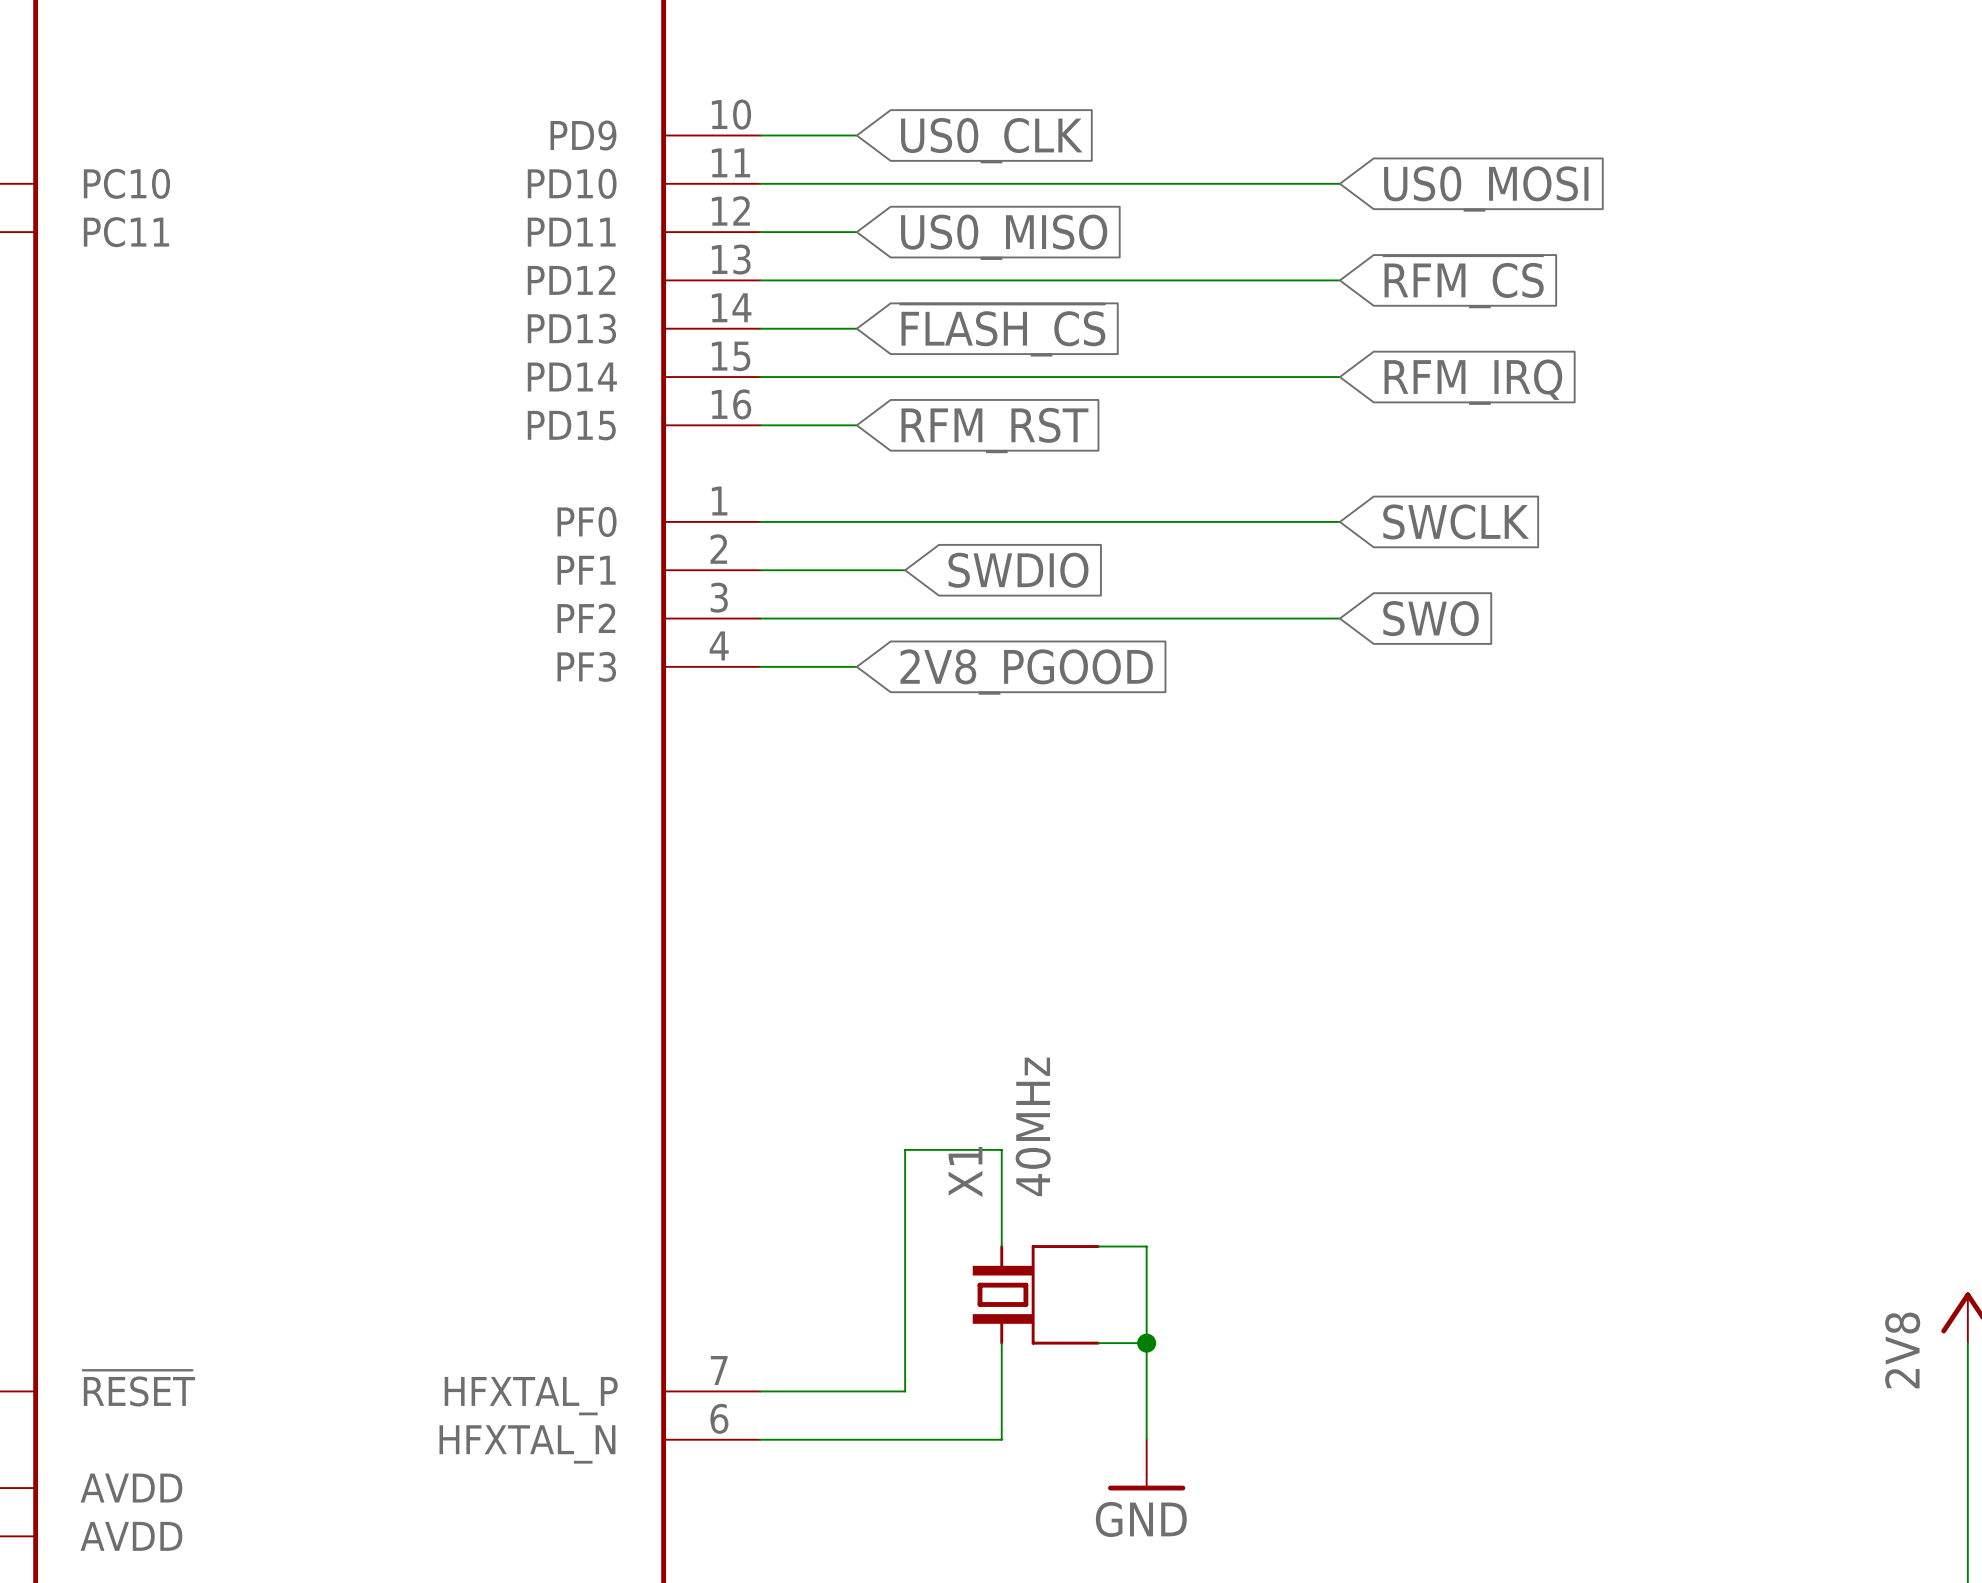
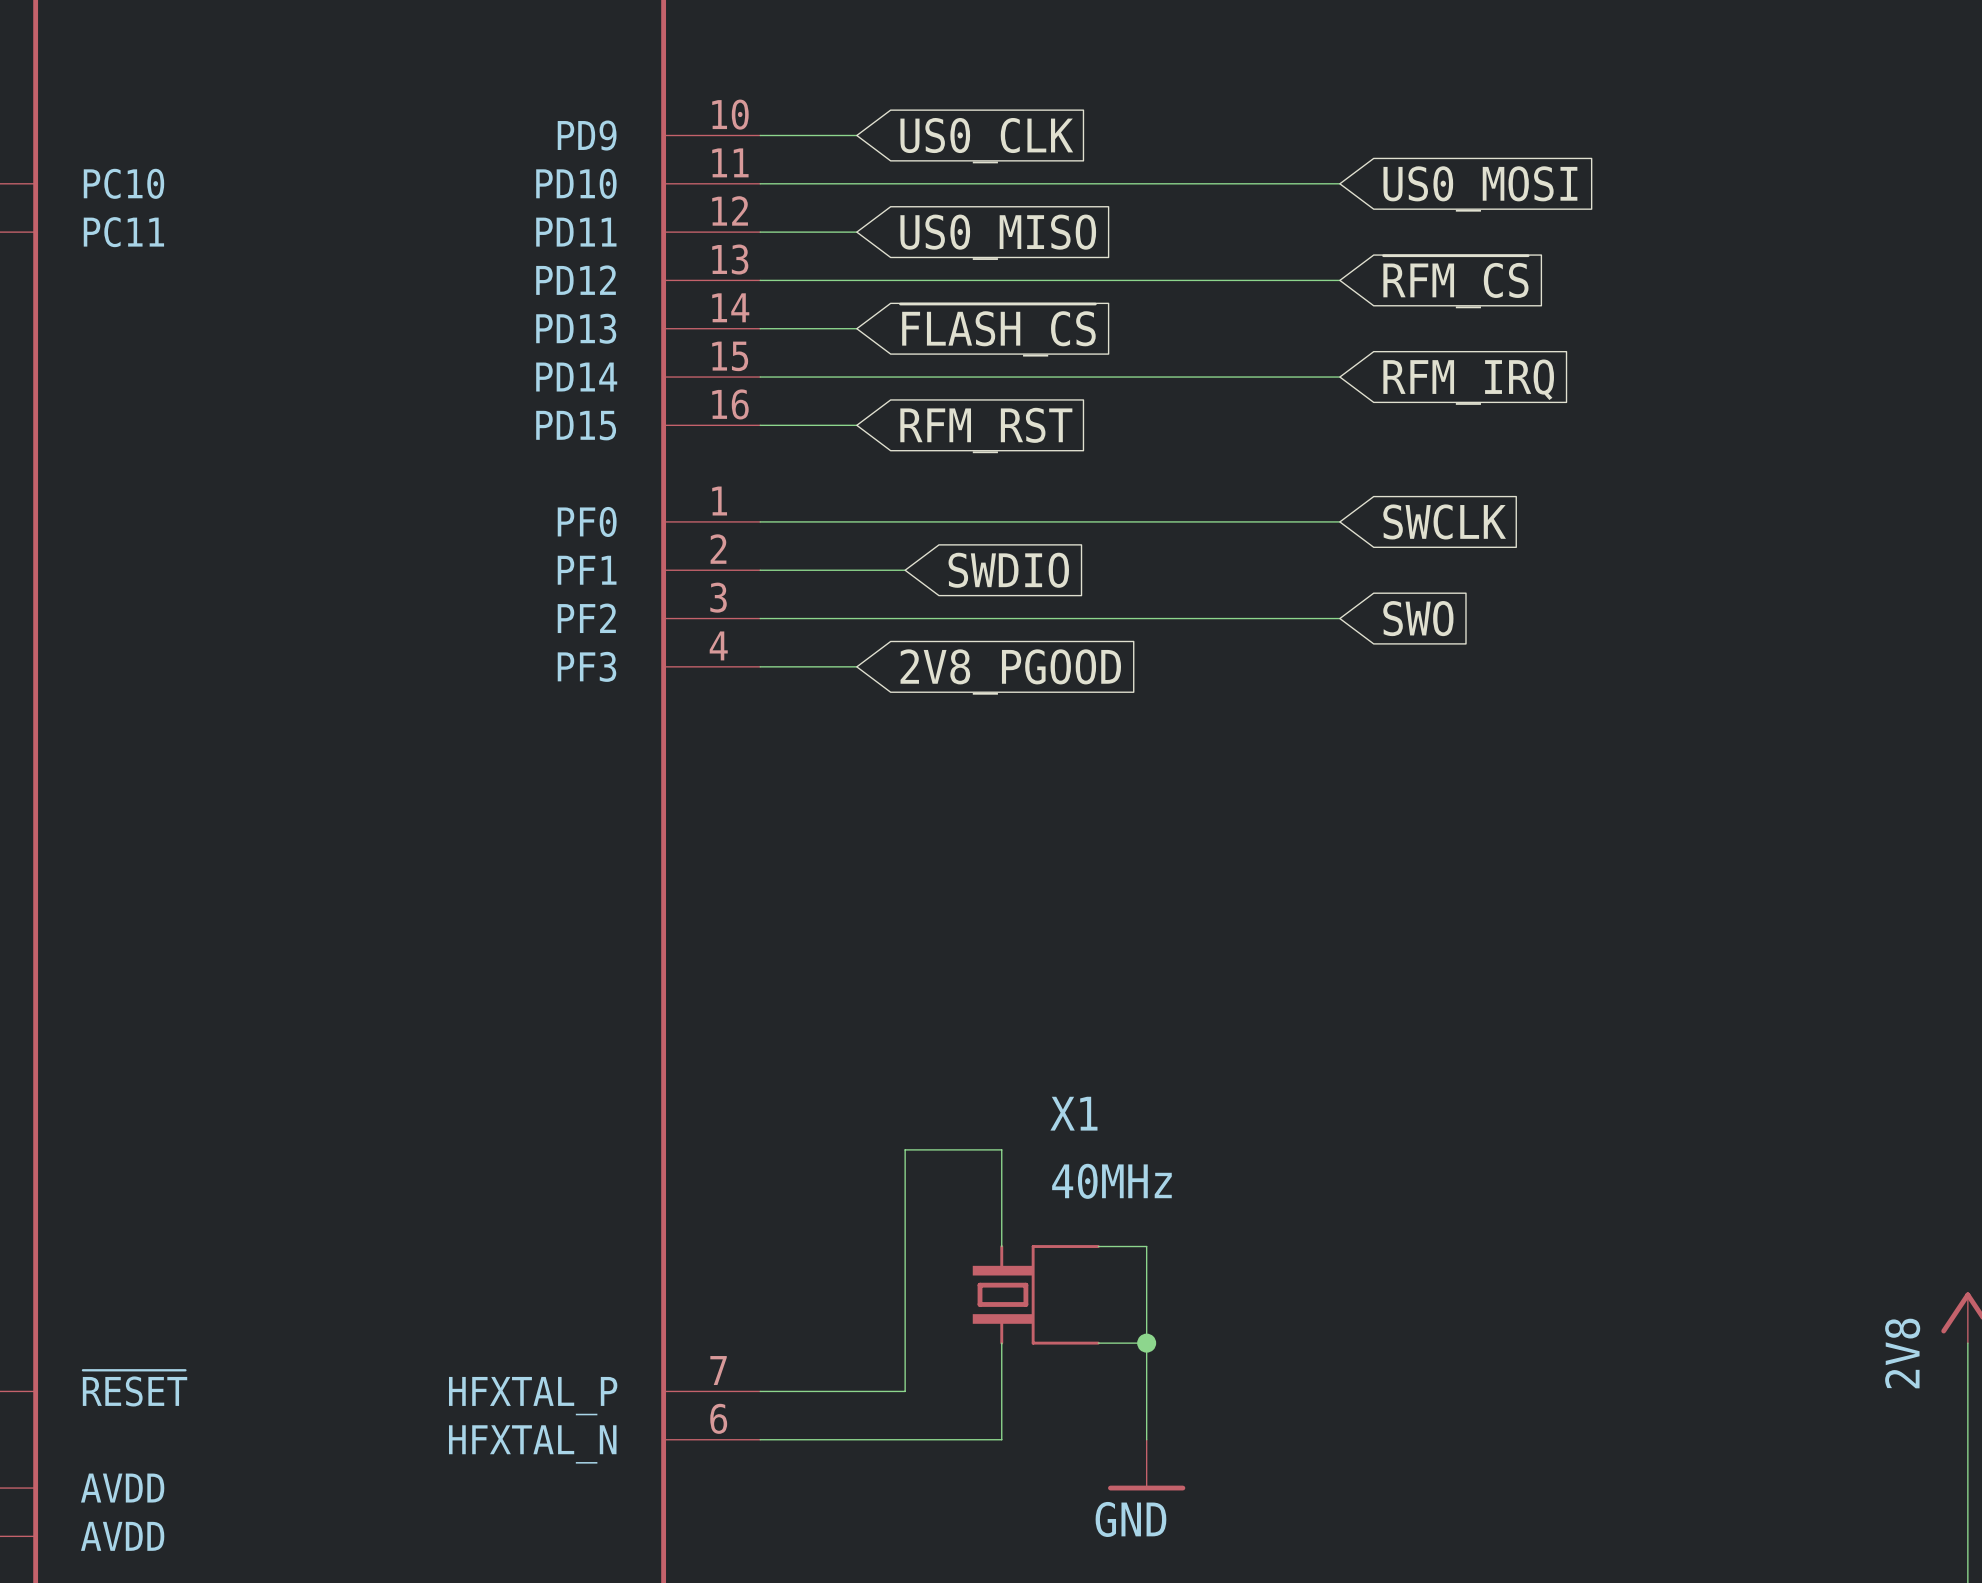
X1 value rotation: 0° (1033, 1126) -> 90° clockwise (1111, 1181)
X1 name rotation: 0° (965, 1171) -> 90° clockwise (1073, 1113)
X1 name position: X1 (965, 1171) -> X1 (1073, 1113)

